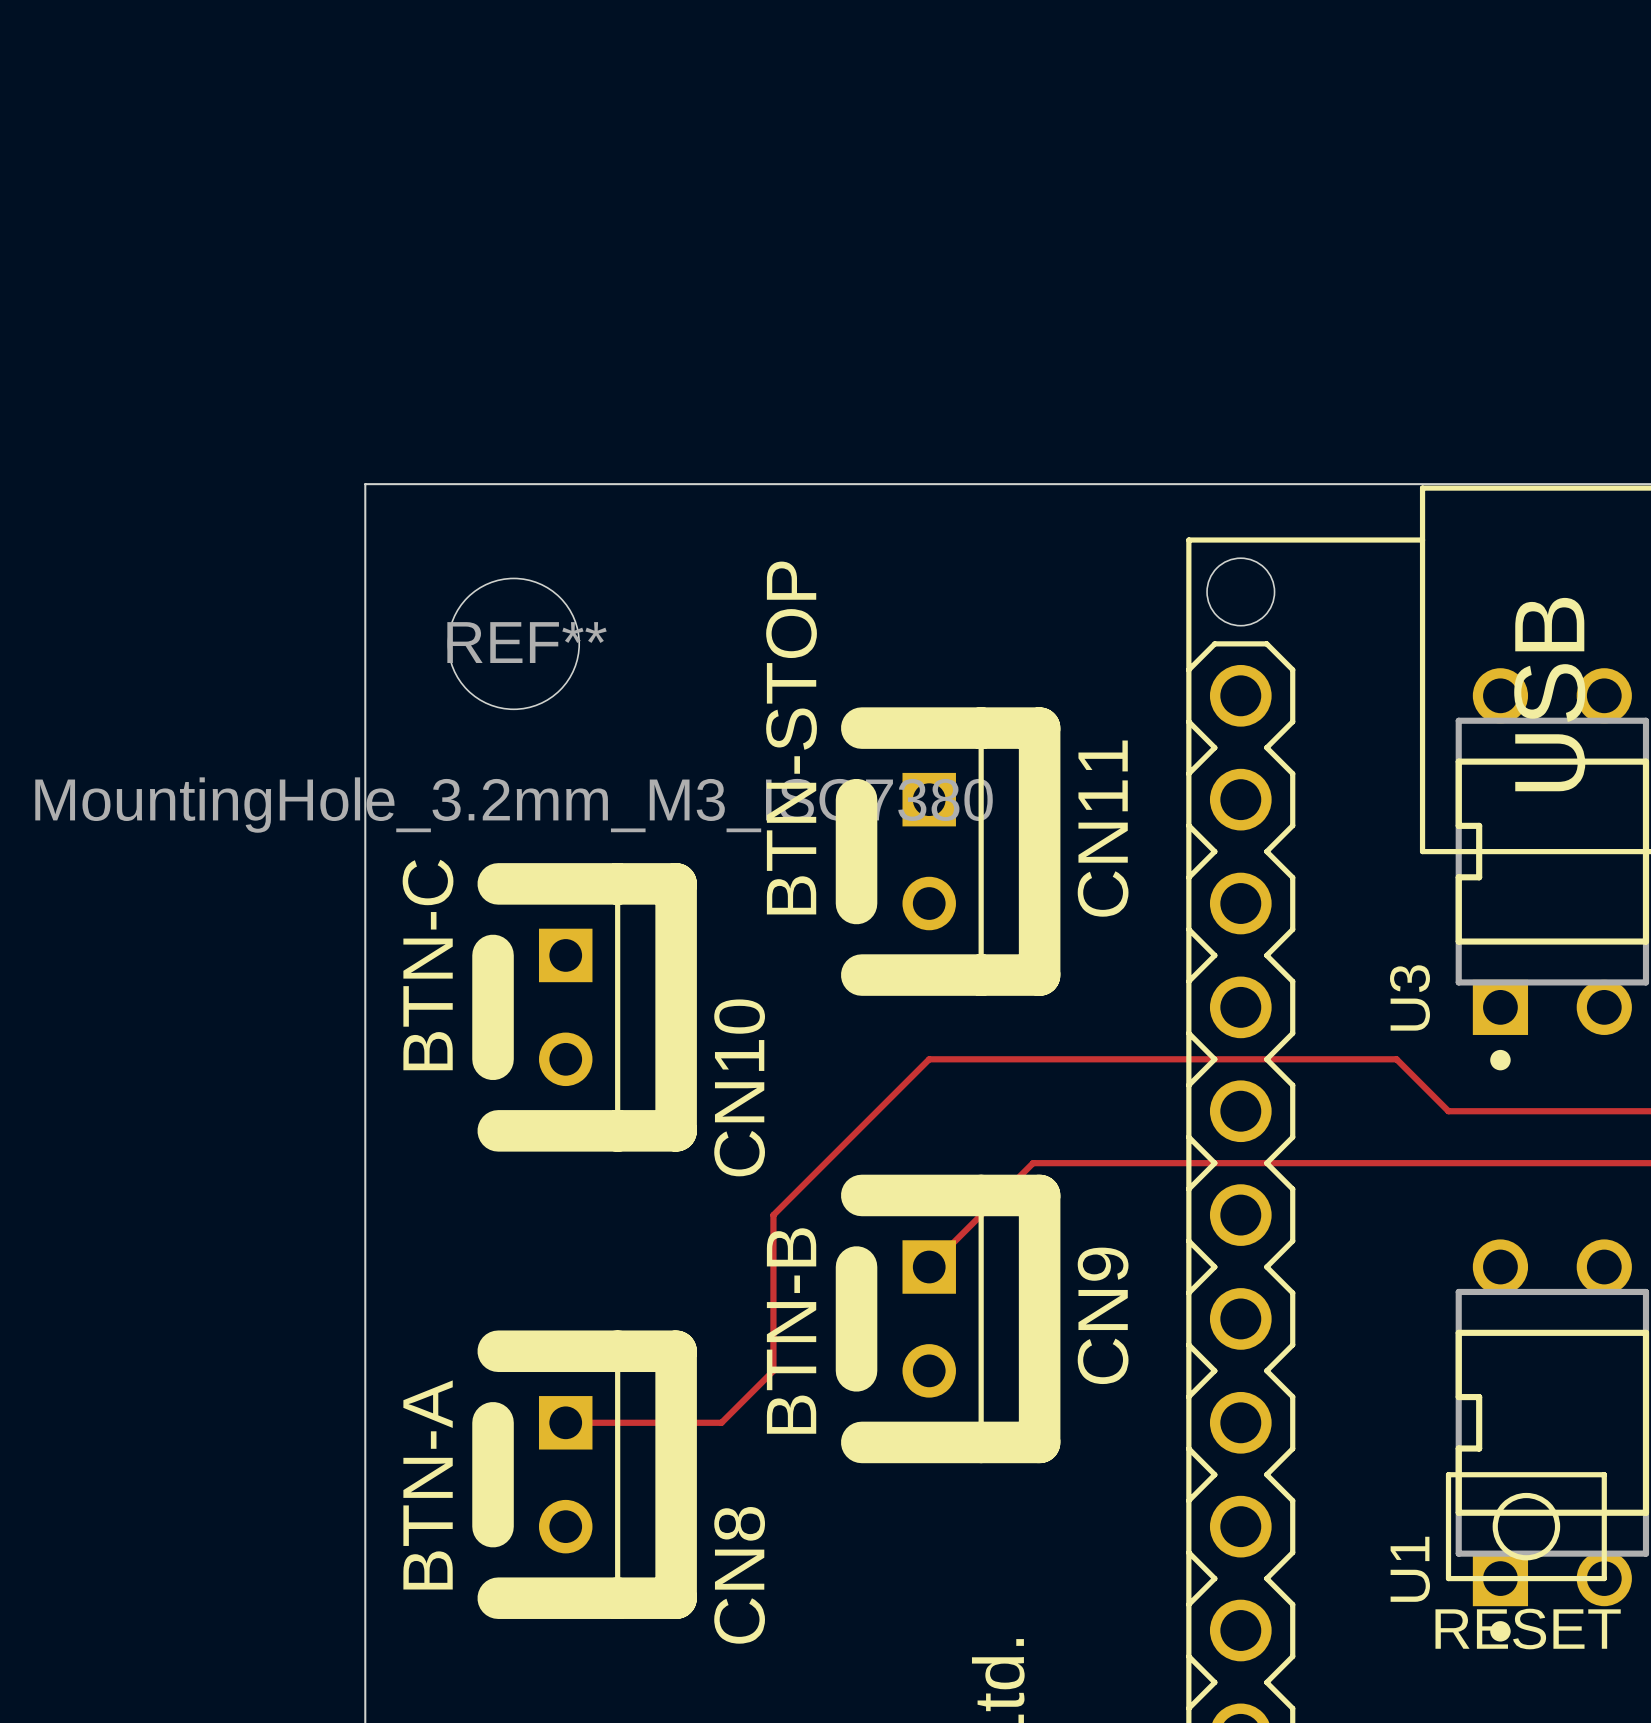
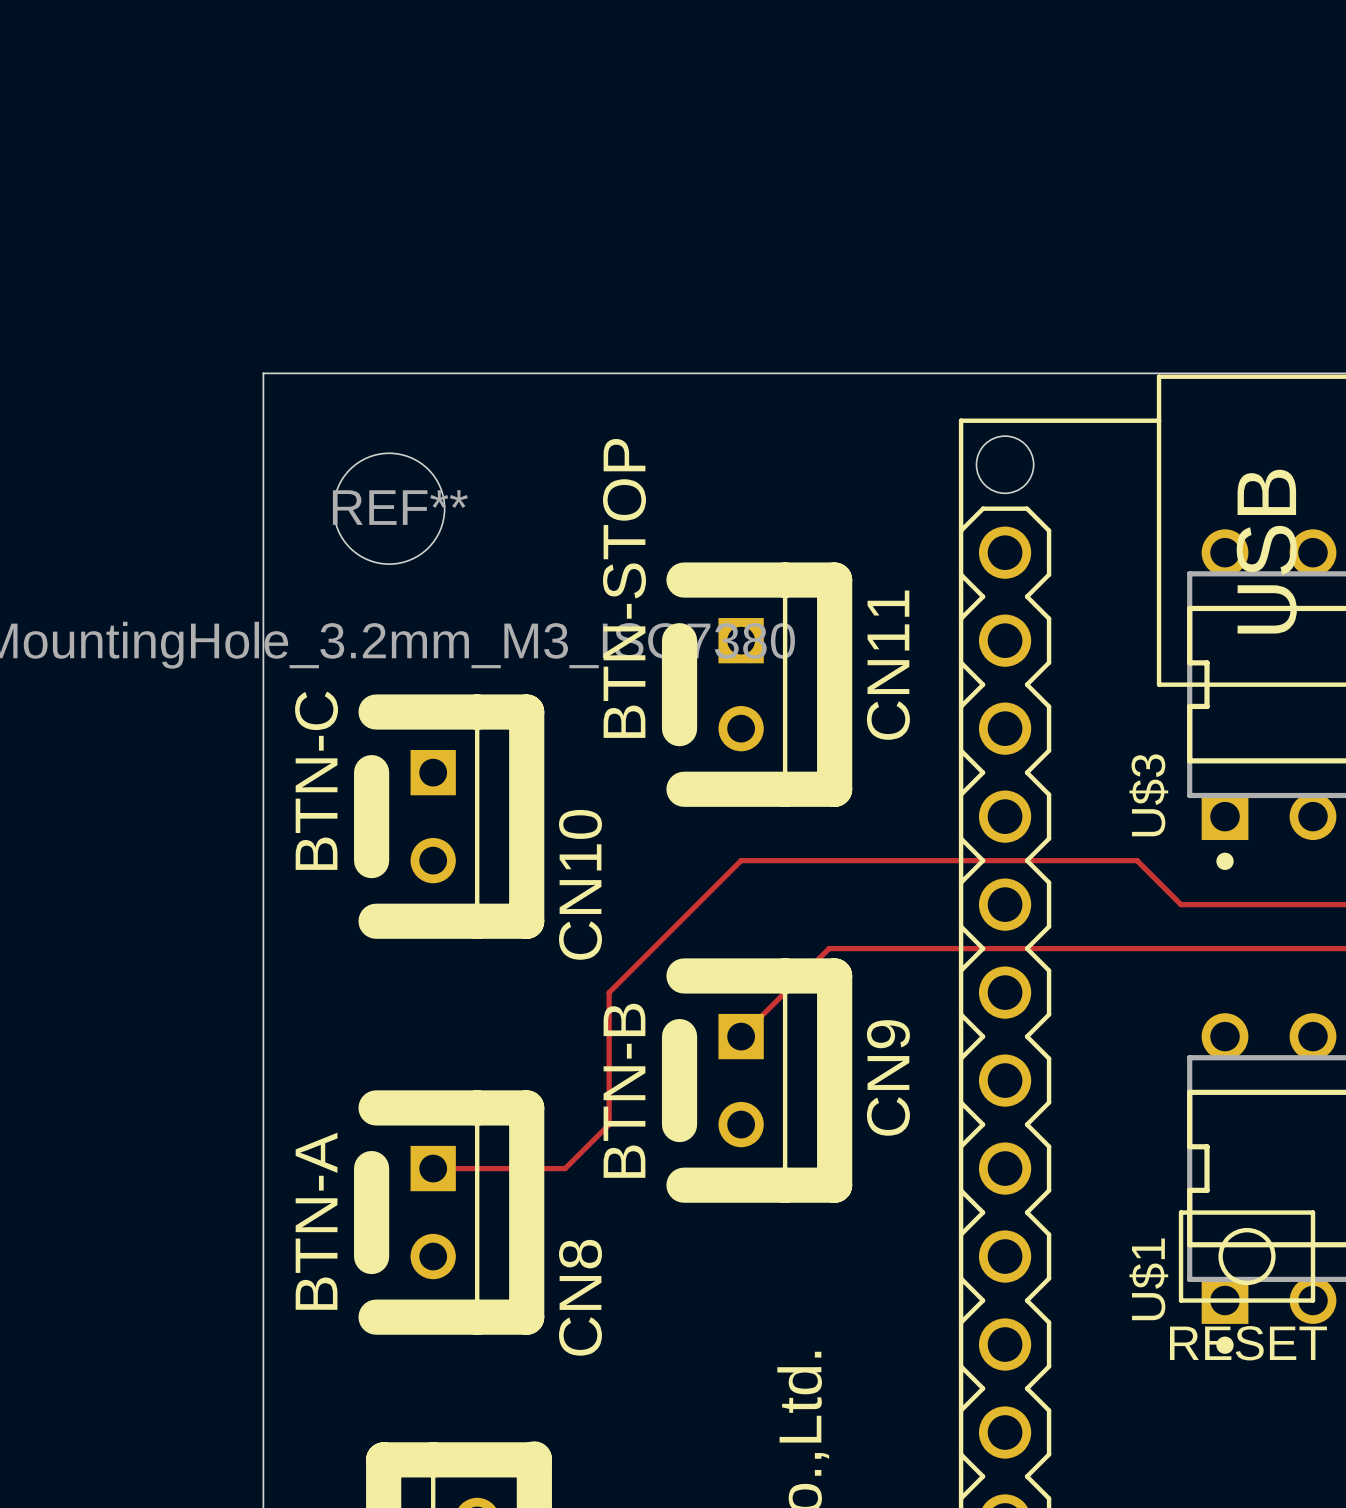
U3 name: U3 (1410, 997) -> U$3 (1148, 795)
U1 name: U1 (1410, 1569) -> U$1 (1148, 1279)

